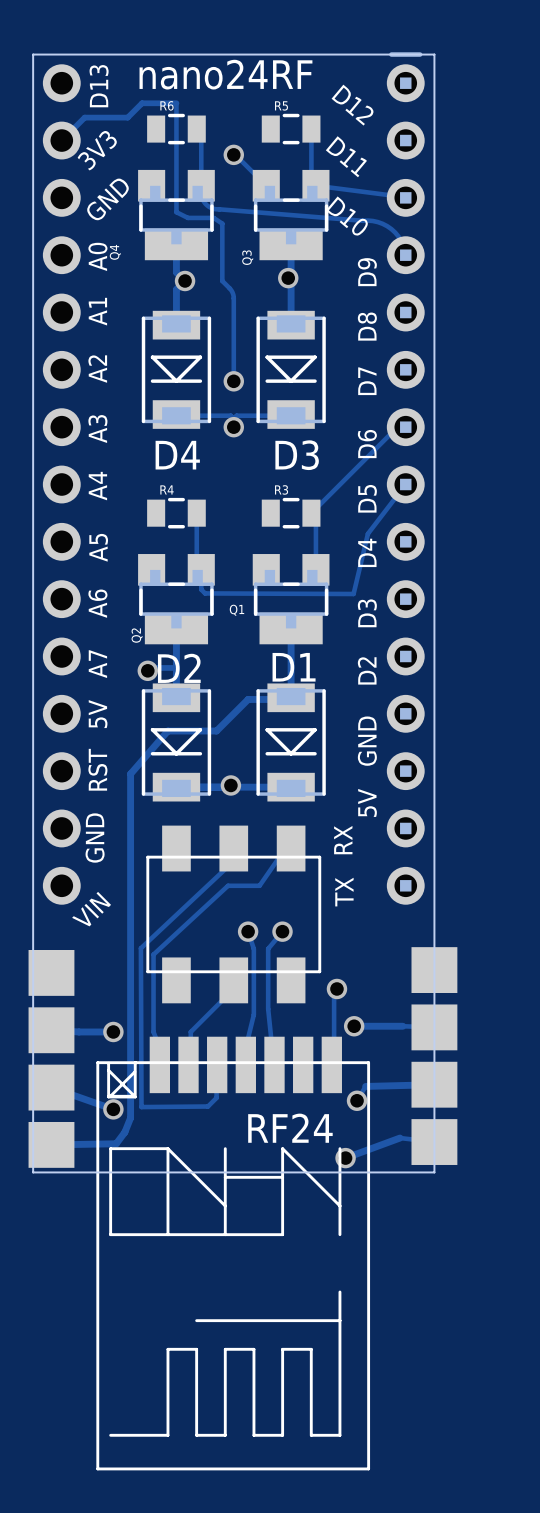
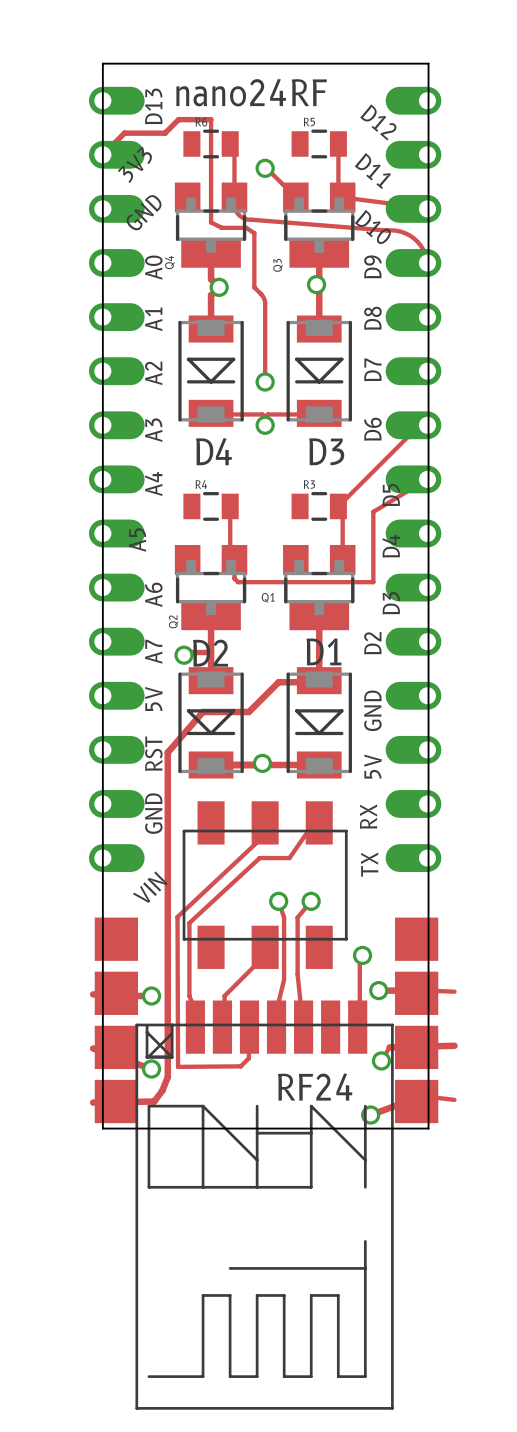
part footprint: [386, 52, 425, 905] -> [385, 86, 442, 873]
part footprint: [42, 64, 81, 905] -> [88, 86, 145, 873]
text position: D13 (99, 86) -> D13 (153, 106)
Q4 name position: Q4 (115, 252) -> Q4 (169, 262)
text position: A0 (97, 256) -> A0 (153, 267)
text position: D9 (367, 272) -> D9 (372, 266)
text position: A1 (97, 311) -> A1 (153, 319)
text position: D8 (367, 326) -> D8 (372, 318)
text position: A2 (97, 369) -> A2 (153, 373)
text position: D7 (367, 381) -> D7 (372, 369)
text position: A3 (97, 429) -> A3 (153, 430)
text position: D6 (367, 444) -> D6 (372, 429)
track: (405, 484) (367, 533) (353, 594) (205, 593) -> (427, 479) (373, 511) (373, 582) (238, 582)
text position: A4 (97, 486) -> A4 (153, 484)
text position: A6 (97, 603) -> A6 (153, 594)
text position: A7 (97, 664) -> A7 (153, 651)
text position: D2 (367, 670) -> D2 (372, 643)
text position: 5V (98, 714) -> 5V (153, 698)
text position: GND (367, 741) -> GND (372, 710)
text position: RST (97, 769) -> RST (153, 753)
text position: 5V (367, 802) -> 5V (372, 766)
text position: GND (95, 838) -> GND (153, 813)
text position: VIN (91, 909) -> VIN (150, 887)
part position: (434, 1056) -> (416, 1020)
part position: (51, 1058) -> (116, 1020)
board edge: (61, 1172) (33, 1172) (33, 54) (434, 54) (434, 1172) (406, 1172) -> (102, 1128) (102, 63) (428, 63) (428, 1128)

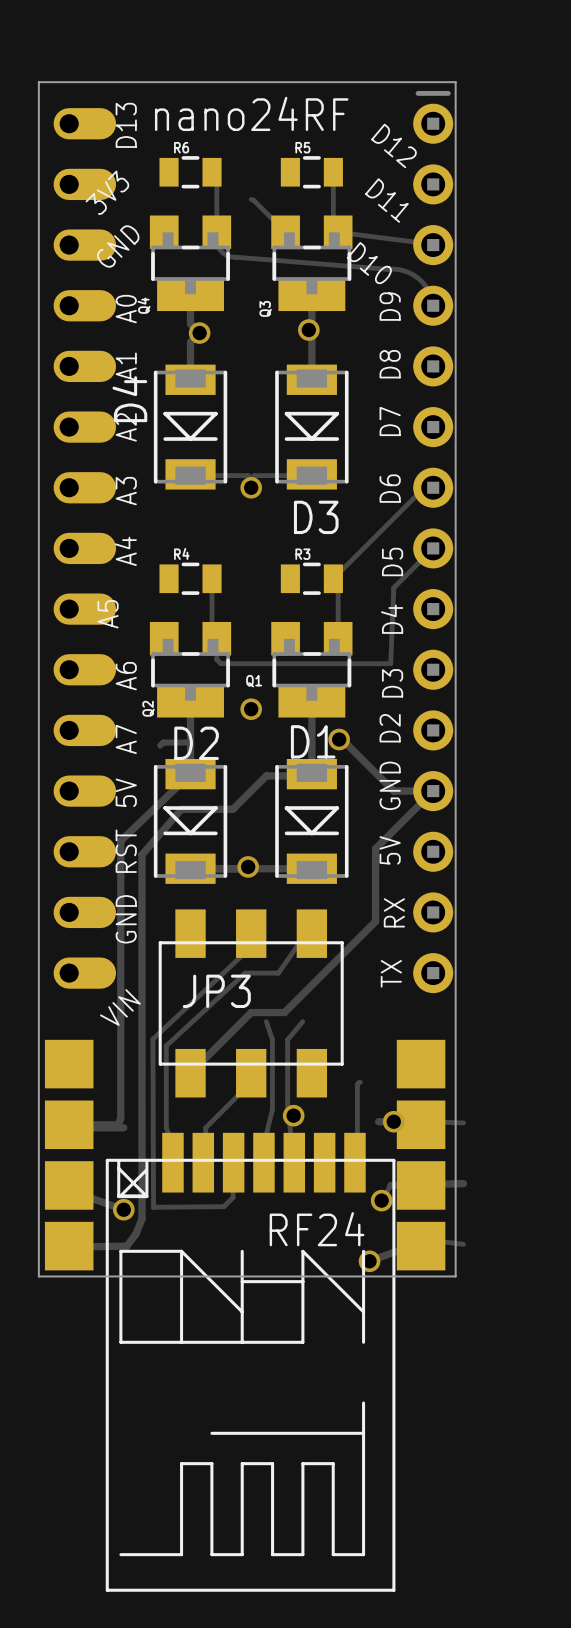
board edge: (102, 63) (102, 1128) -> (69, 82) (38, 82) (38, 1276) (69, 1276)
board edge: (428, 63) (428, 1128) -> (434, 82) (455, 82) (455, 1276) (434, 1276)
part footprint: [385, 86, 442, 873] -> [413, 90, 454, 994]
text position: D12 (378, 122) -> D12 (394, 145)
track: (102, 154) (124, 133) (165, 133) (178, 119) (211, 119) (211, 222) (221, 227) (246, 227) (254, 233) (254, 287) (262, 295) (265, 302) (265, 382) -> none
via: (265, 168) -> none
text position: D11 (372, 171) -> D11 (386, 200)
text position: D9 (372, 266) -> D9 (390, 306)
text position: D8 (372, 318) -> D8 (390, 364)
text position: D7 (372, 369) -> D7 (390, 421)
via: (265, 382) -> none
text position: D6 (372, 429) -> D6 (390, 488)
D4 name rotation: 0° (213, 451) -> 90° counterclockwise (129, 399)
D4 name position: D4 (213, 451) -> D4 (129, 399)
track: (427, 479) (373, 511) (373, 582) -> (433, 548) (393, 587) (390, 663) (372, 663)
via: none -> (251, 709)
text position: D2 (372, 643) -> D2 (390, 728)
track: none -> (339, 739) (342, 739) (393, 791) (433, 791) (375, 848) (375, 921) (284, 1012) (251, 1012) (190, 1073)
via: none -> (339, 739)
via: (184, 655) -> none
track: none -> (190, 774) (120, 840) (120, 1118) (117, 1124) (69, 1124)
text position: GND (372, 710) -> GND (390, 785)
text position: 5V (372, 766) -> 5V (390, 850)
text position: RX (368, 816) -> RX (394, 912)
text position: TX (369, 864) -> TX (391, 973)
JP3 name: none -> JP3 (216, 991)
via: (278, 901) -> none
via: (311, 901) -> none
via: (362, 955) -> none
via: none -> (293, 1115)
via position: (378, 990) -> (393, 1121)
via: (151, 996) -> none
part position: (116, 1020) -> (69, 1155)

